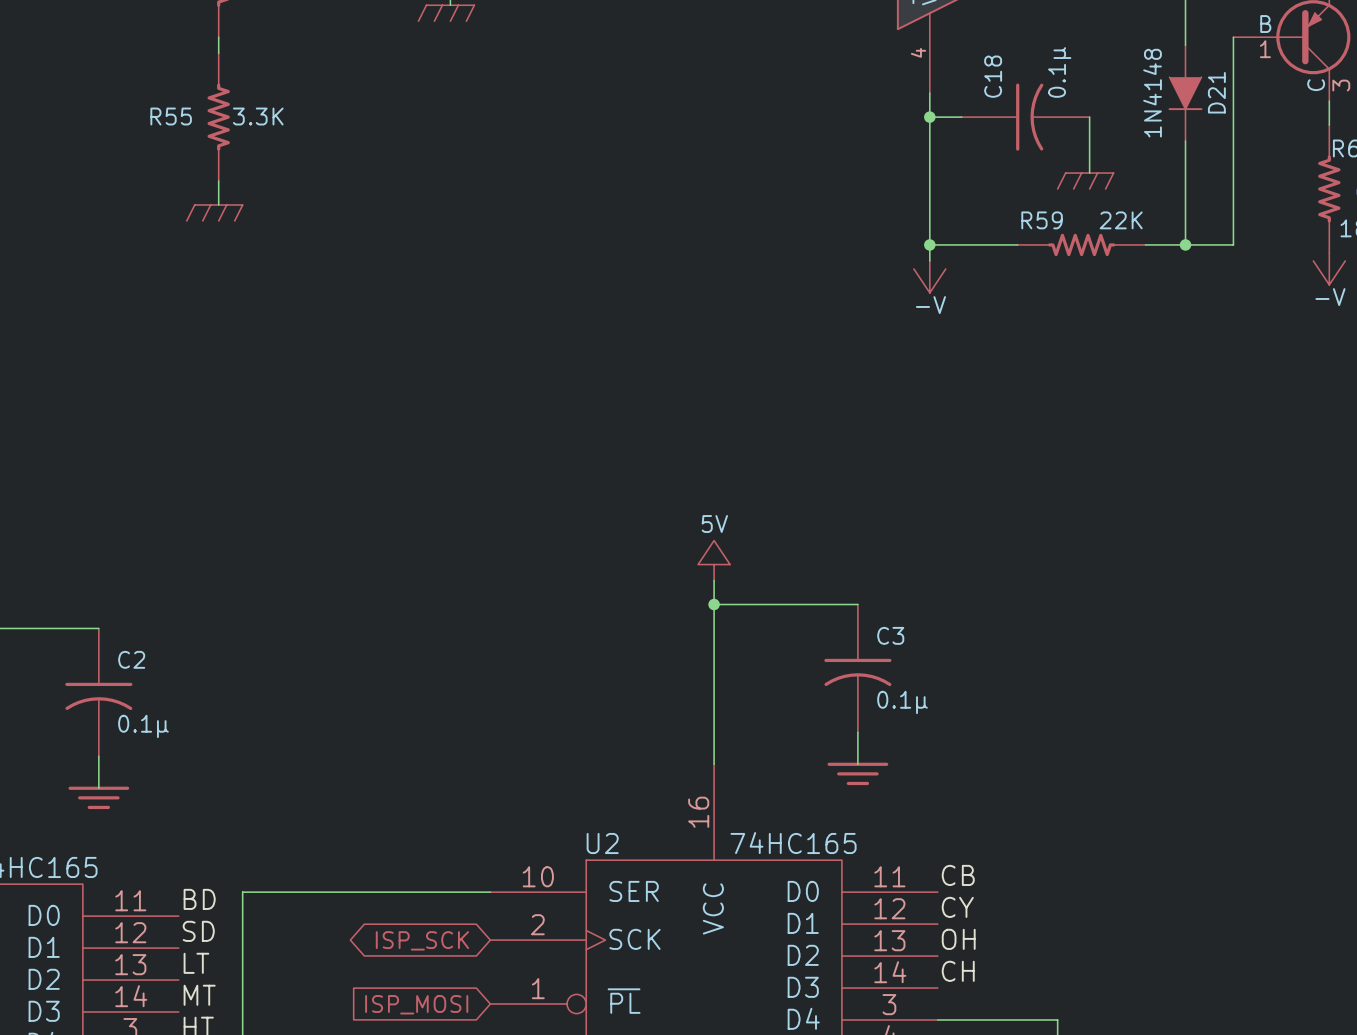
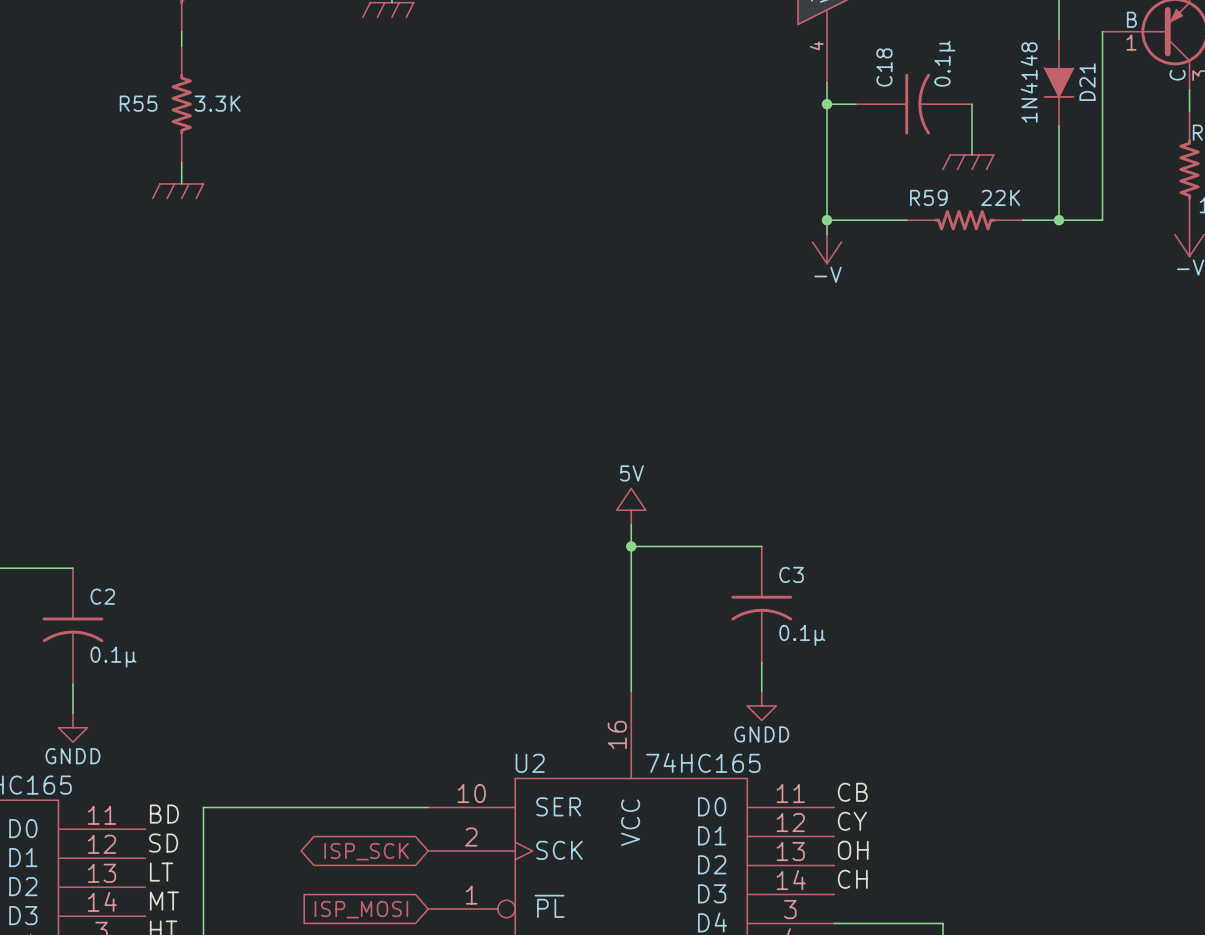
power symbol shape: [827, 762, 889, 786] -> [747, 691, 777, 721]
power symbol shape: [68, 786, 130, 810] -> [58, 713, 88, 743]
power symbol text: none -> GNDD (761, 734)
power symbol text: none -> GNDD (72, 756)

